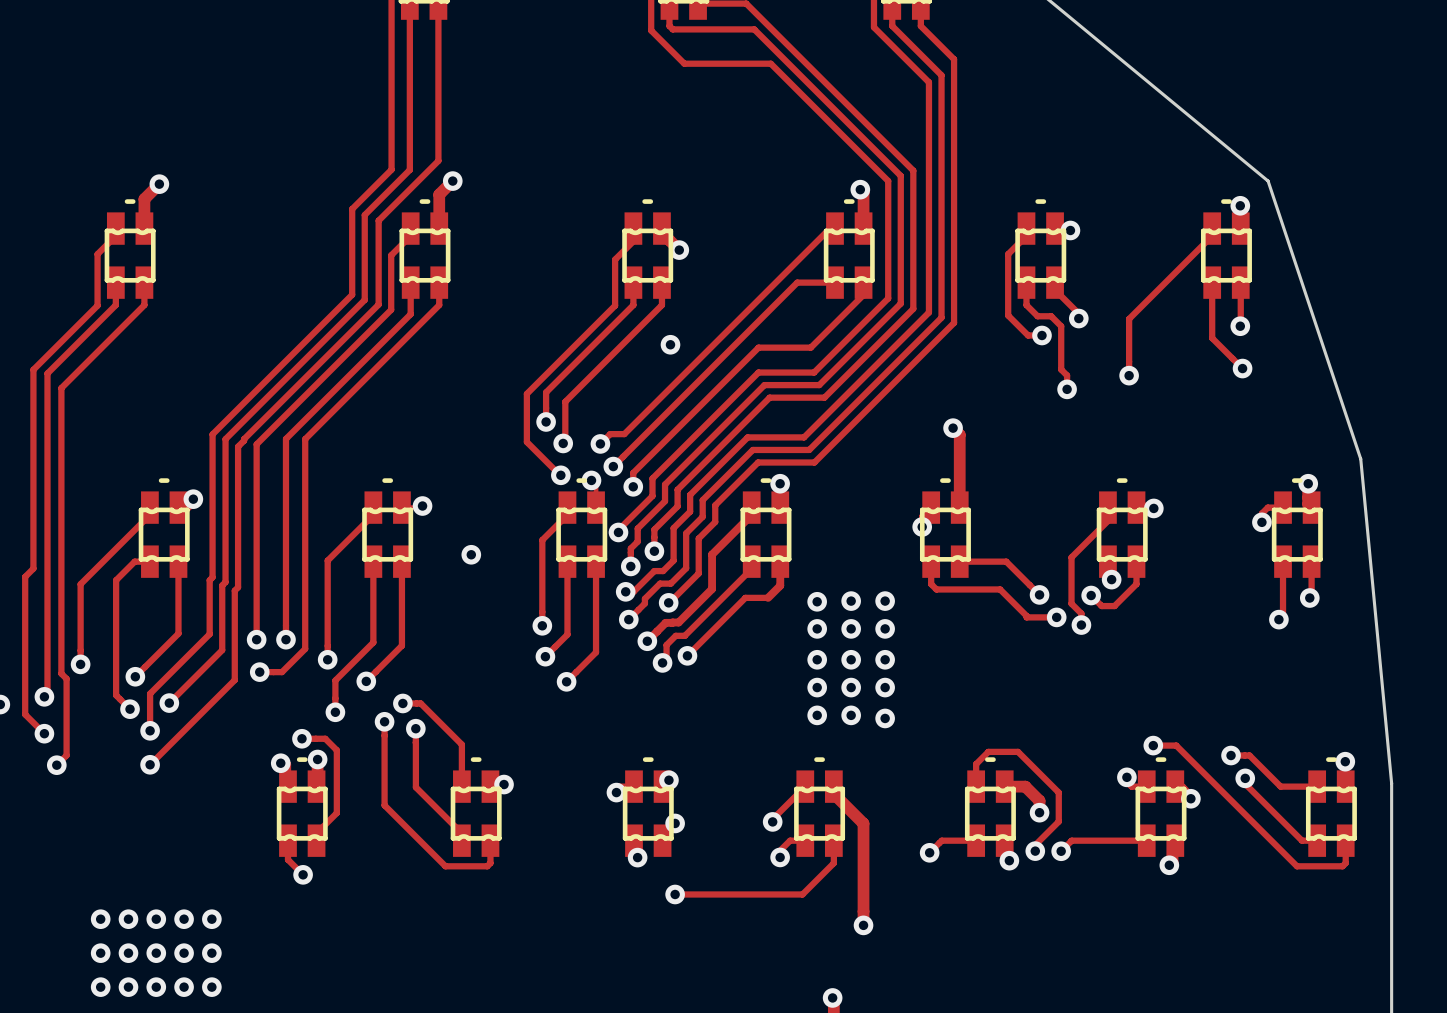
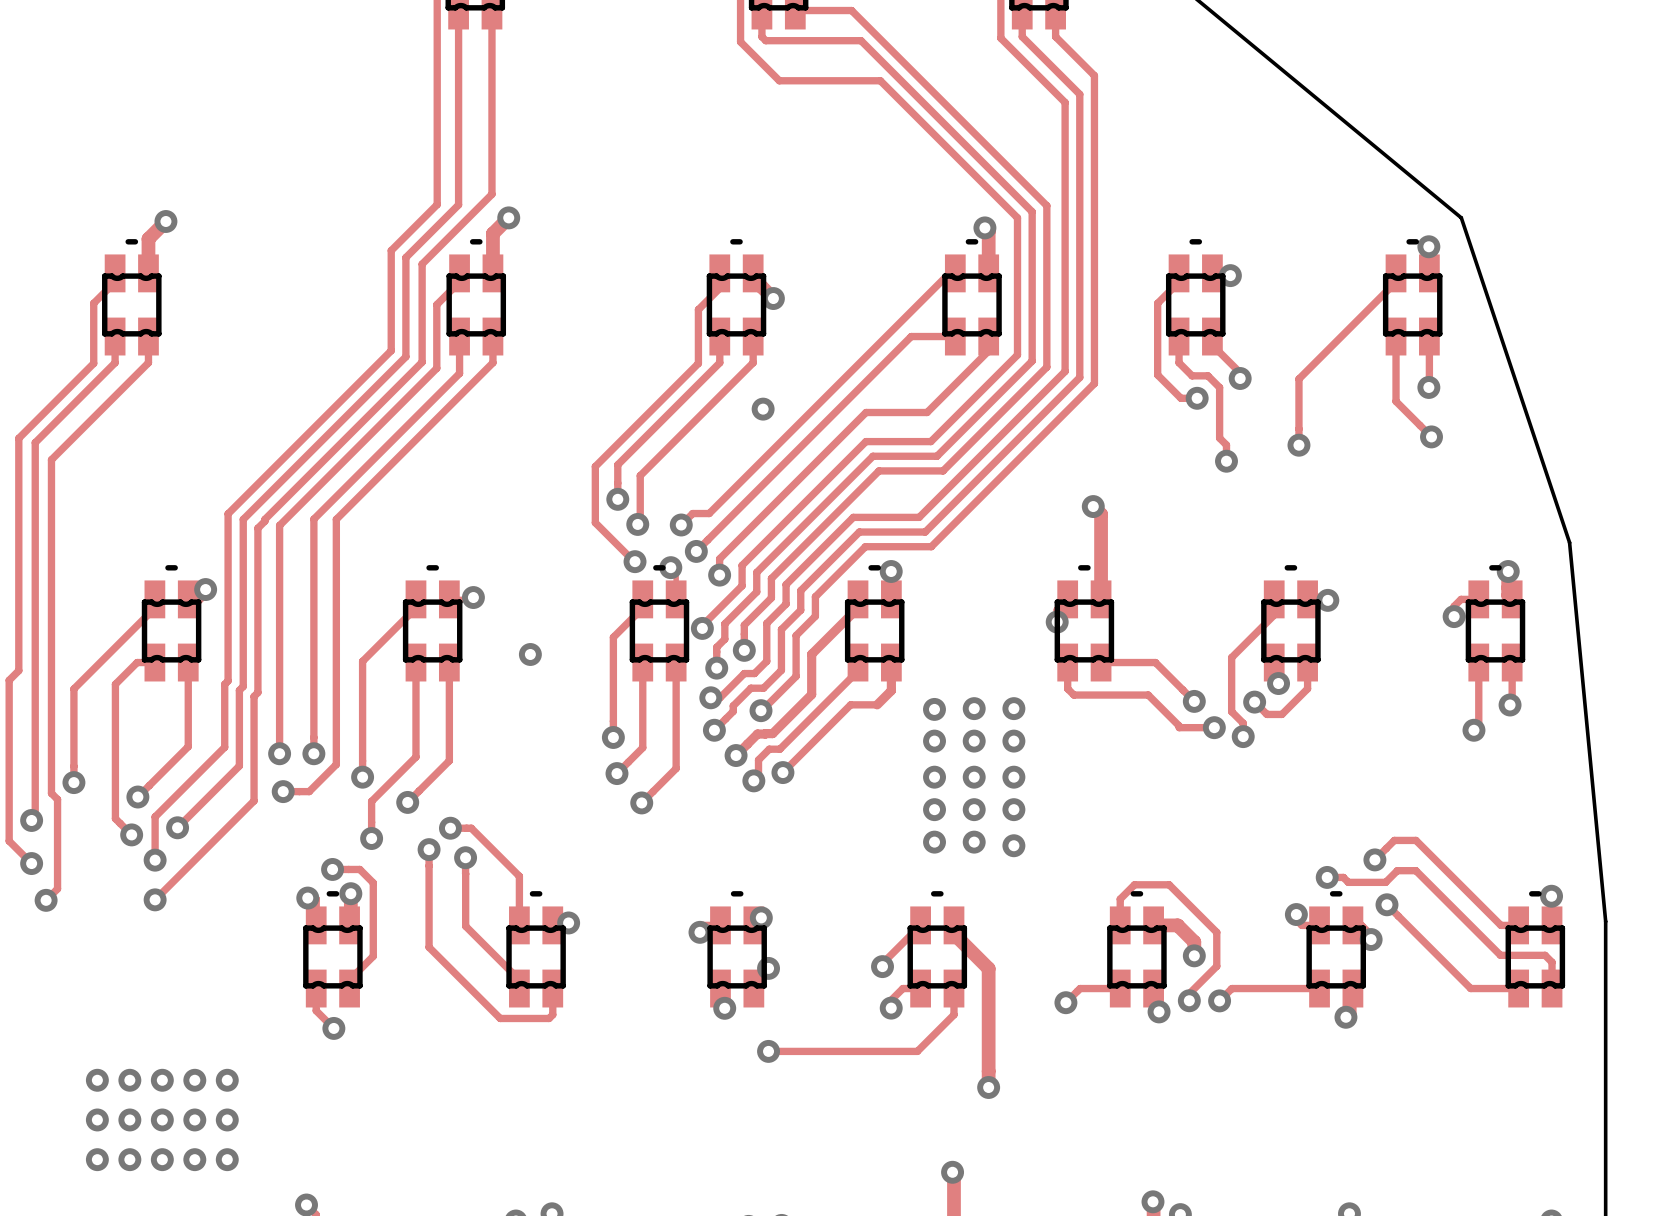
via: none -> (1374, 859)
track: (1167, 745) (1176, 745) (1297, 866) (1342, 866) (1345, 863) (1345, 840) -> (1343, 877) (1348, 882) (1385, 882) (1397, 870) (1415, 870) (1500, 955) (1545, 955) (1552, 962) (1552, 988)
track: (1231, 755) (1249, 755) (1280, 786) (1301, 786) -> (1374, 859) (1394, 840) (1415, 840) (1500, 925)
via: (1231, 755) -> none
via: none -> (1386, 904)
track: (1245, 778) (1245, 783) (1301, 840) -> (1386, 904) (1470, 988) (1500, 988)
via: (1245, 778) -> none

